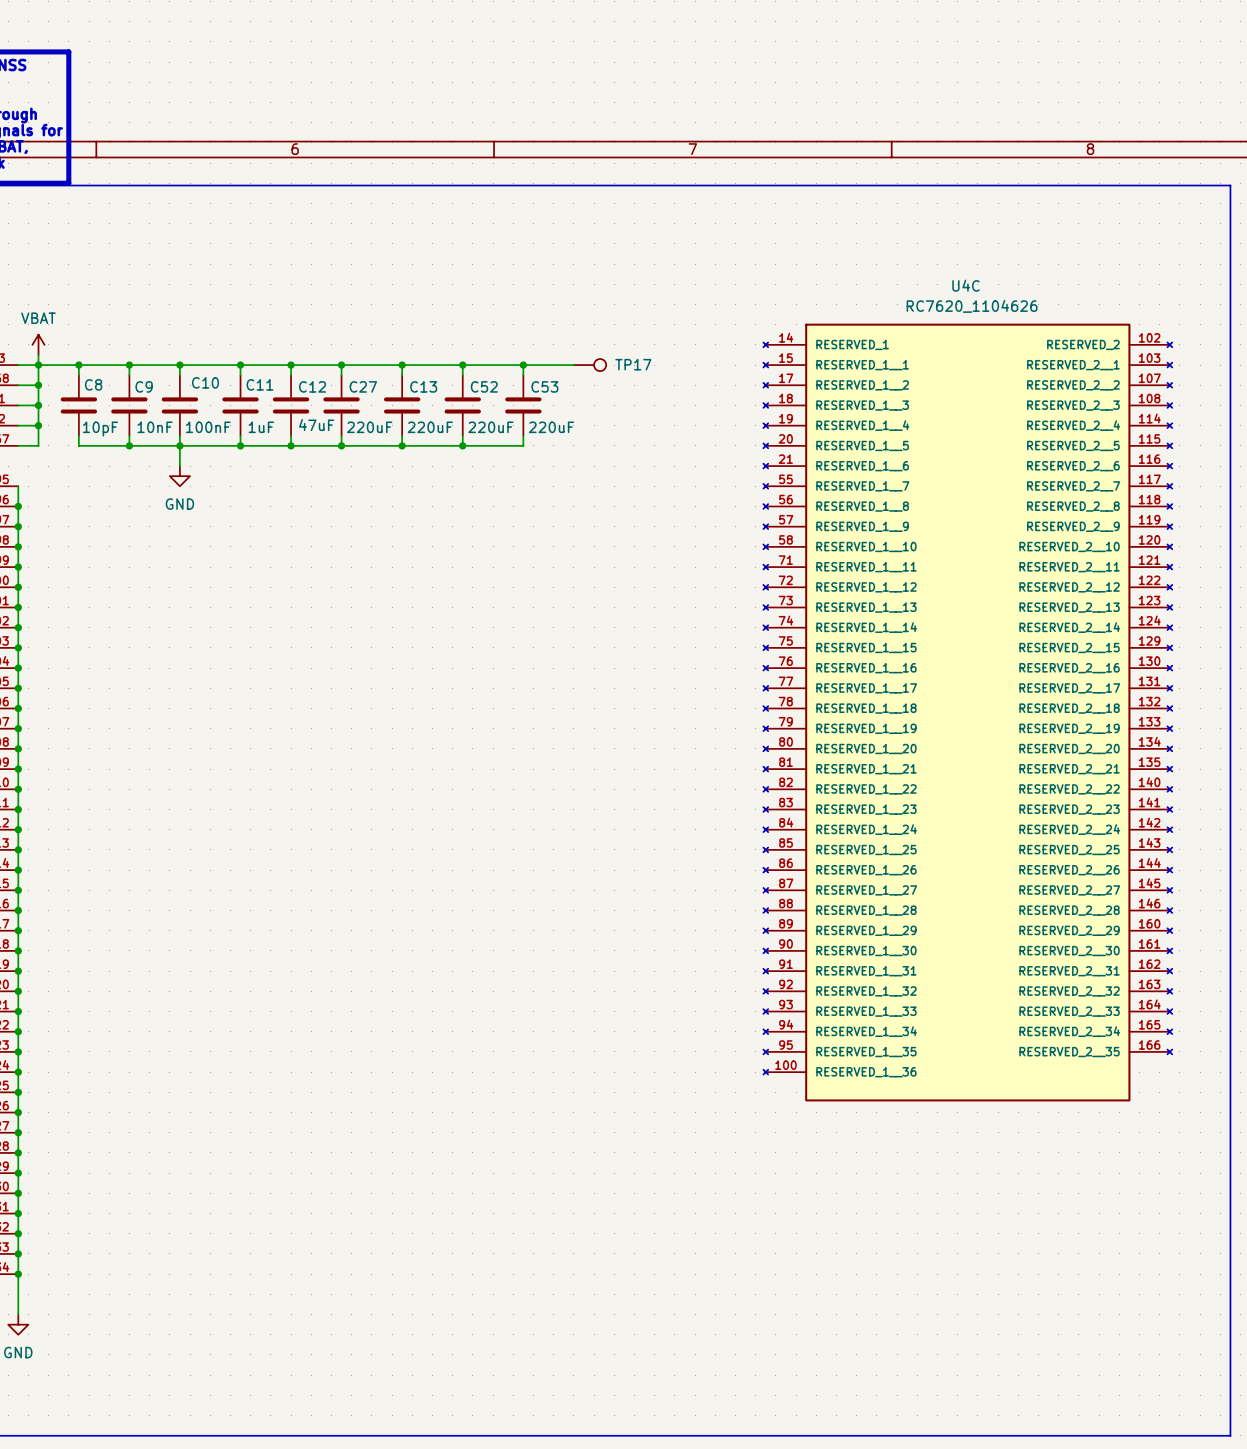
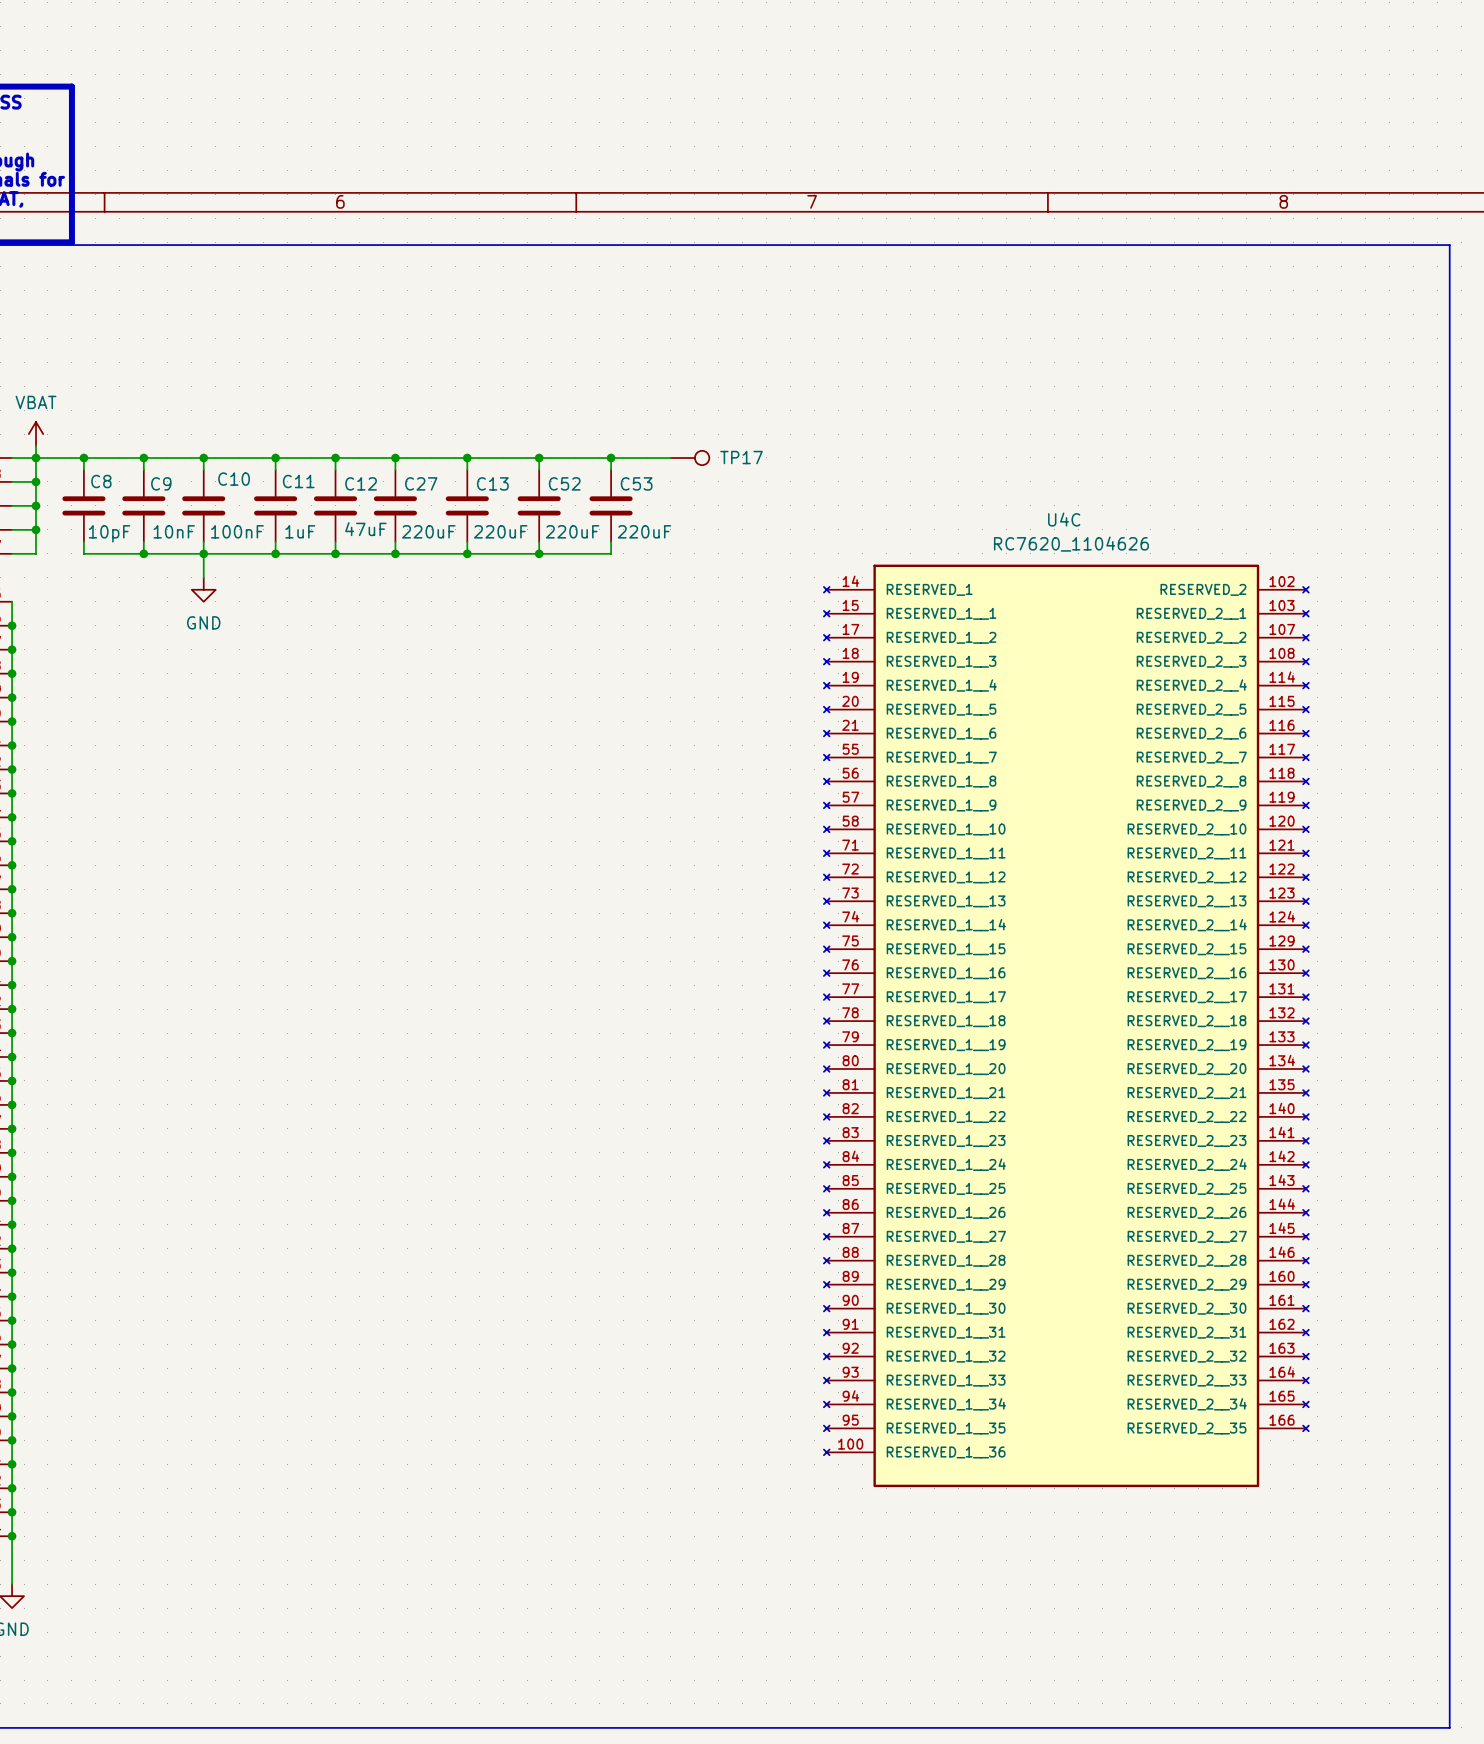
U4C position: (967, 712) -> (1066, 1025)

